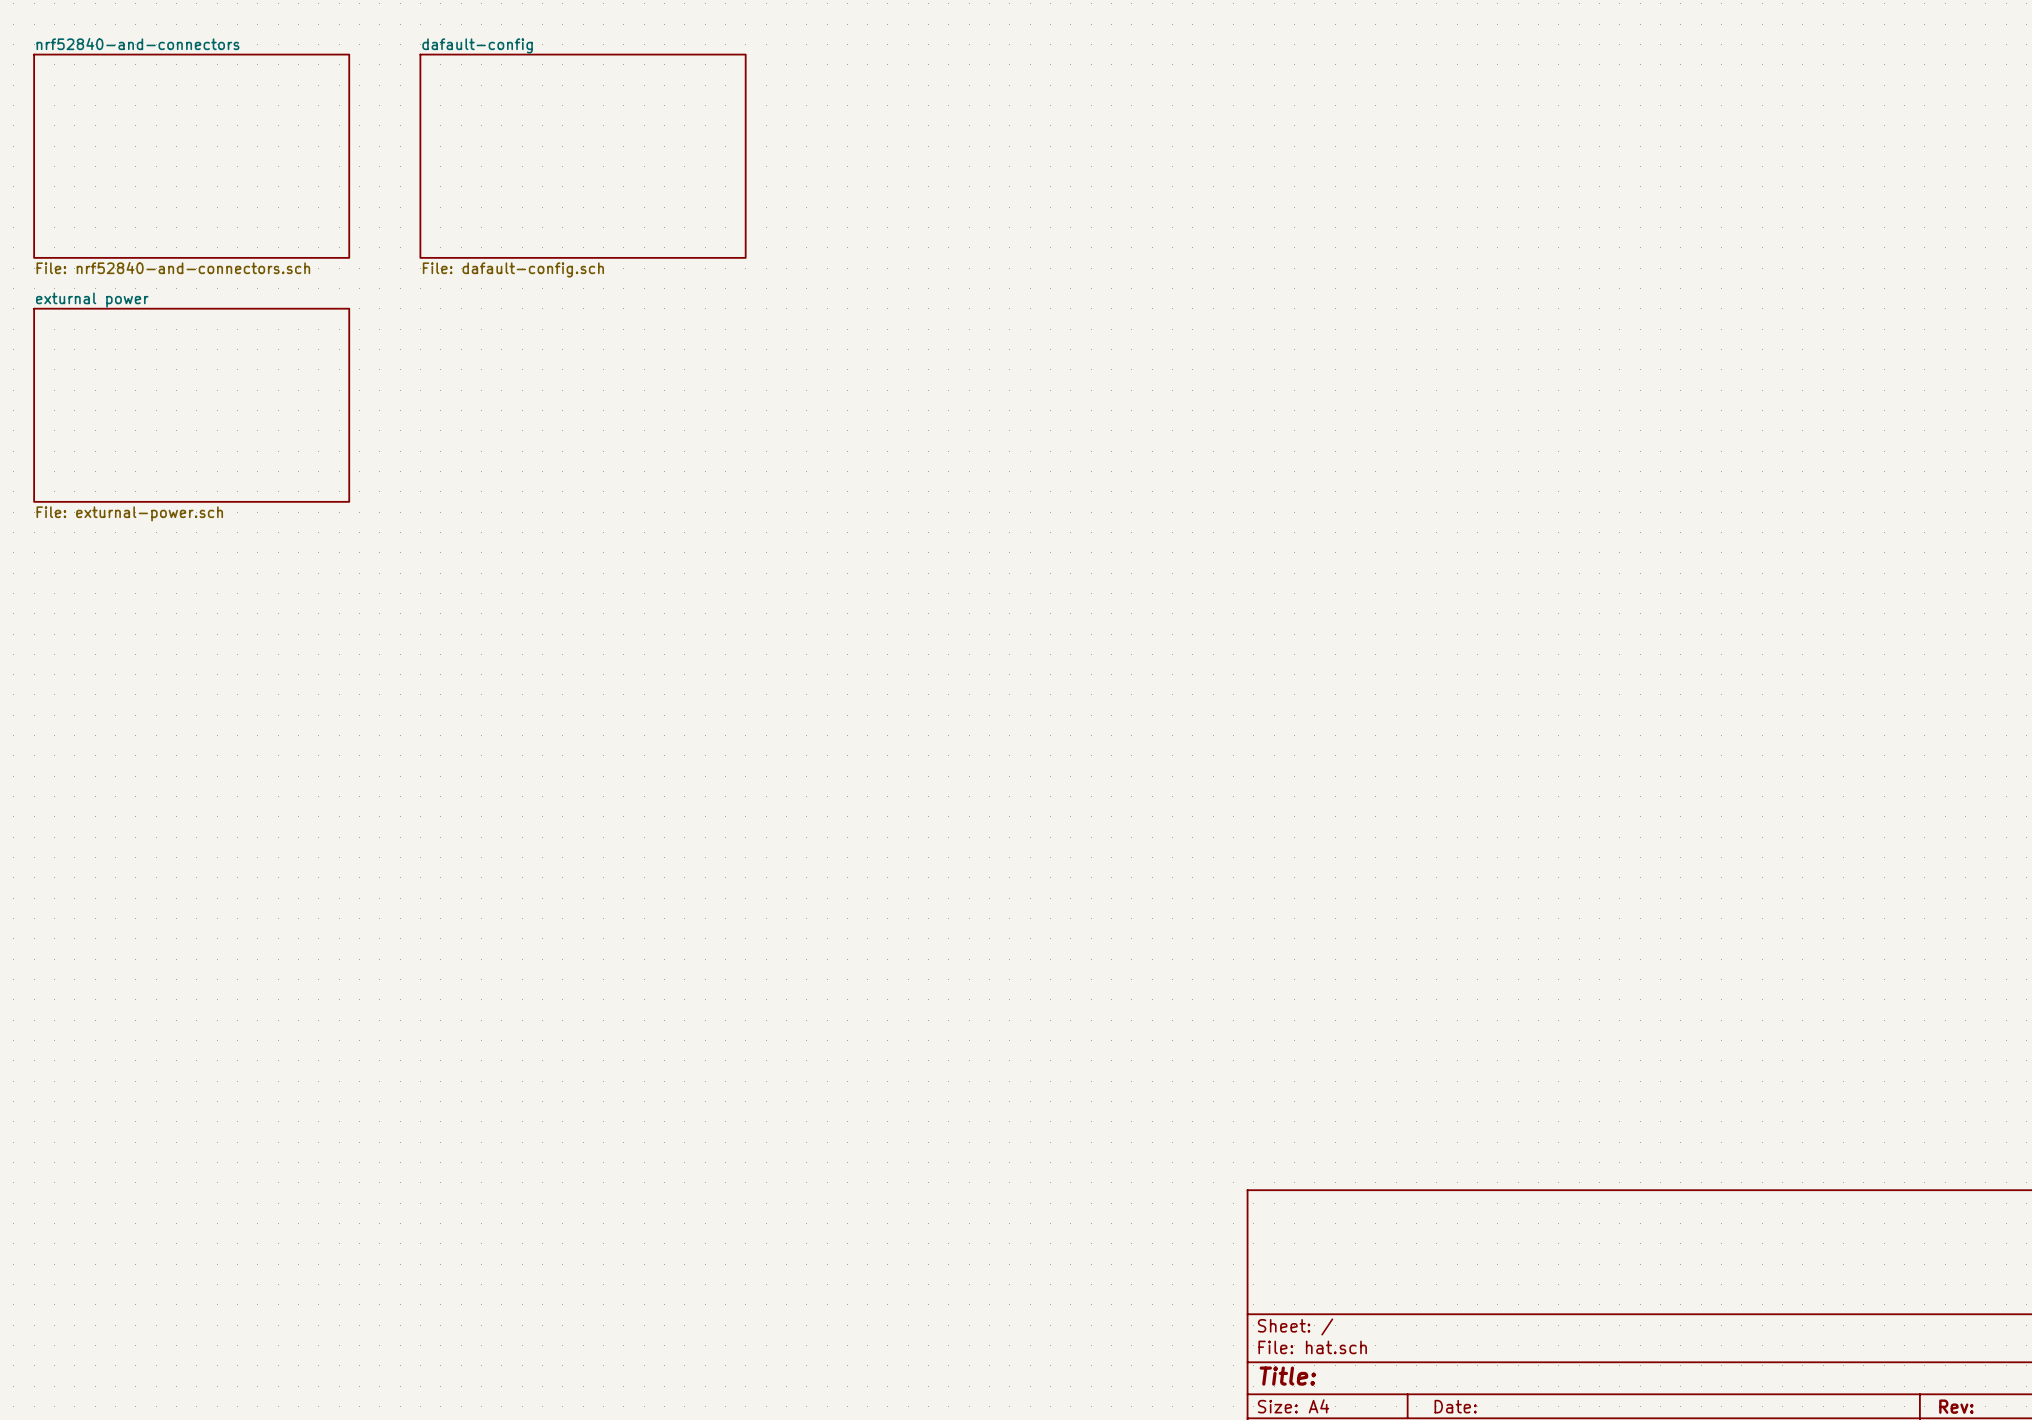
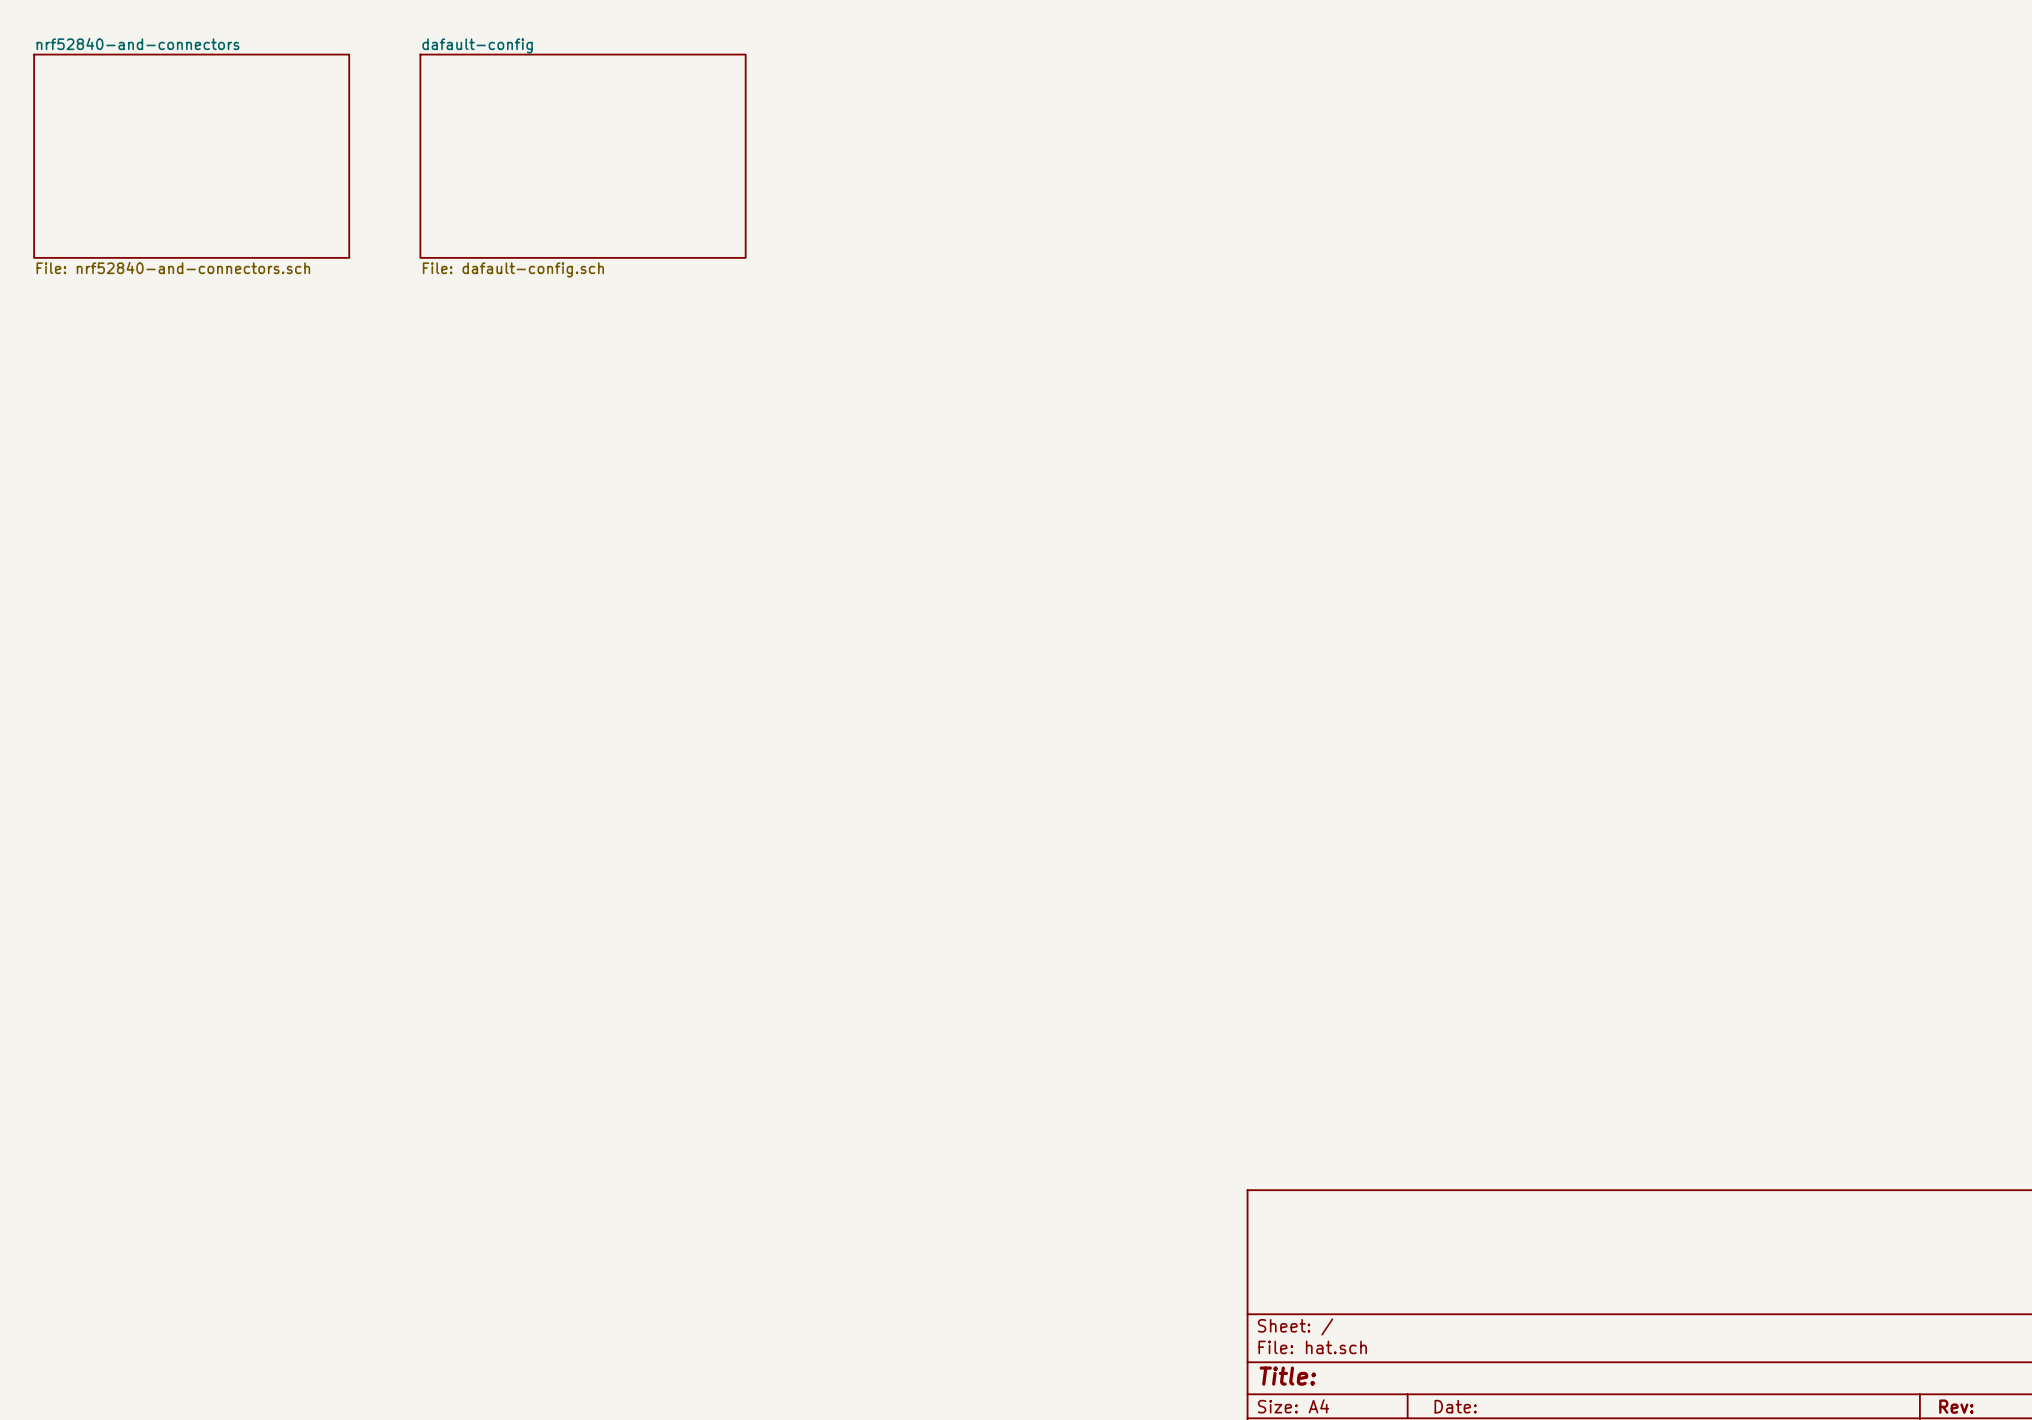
sheet exturnal power: File: exturnal-power.sch (191, 405) -> none

